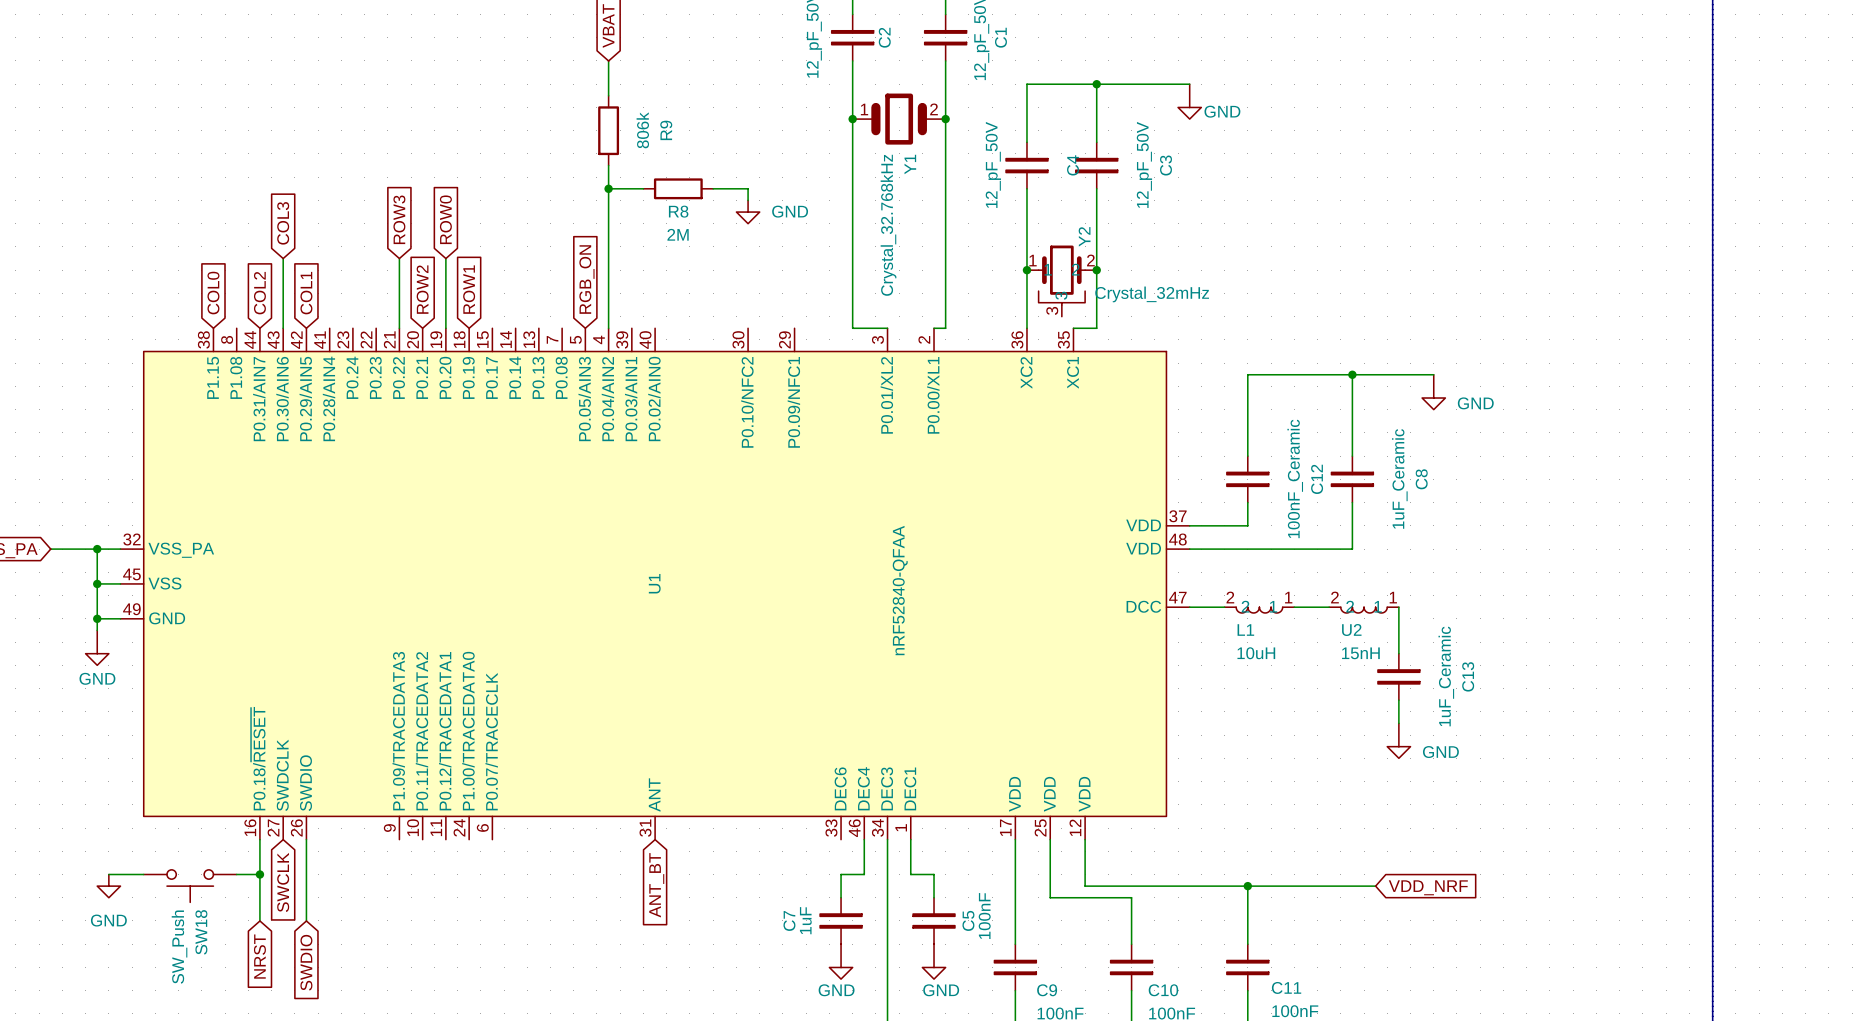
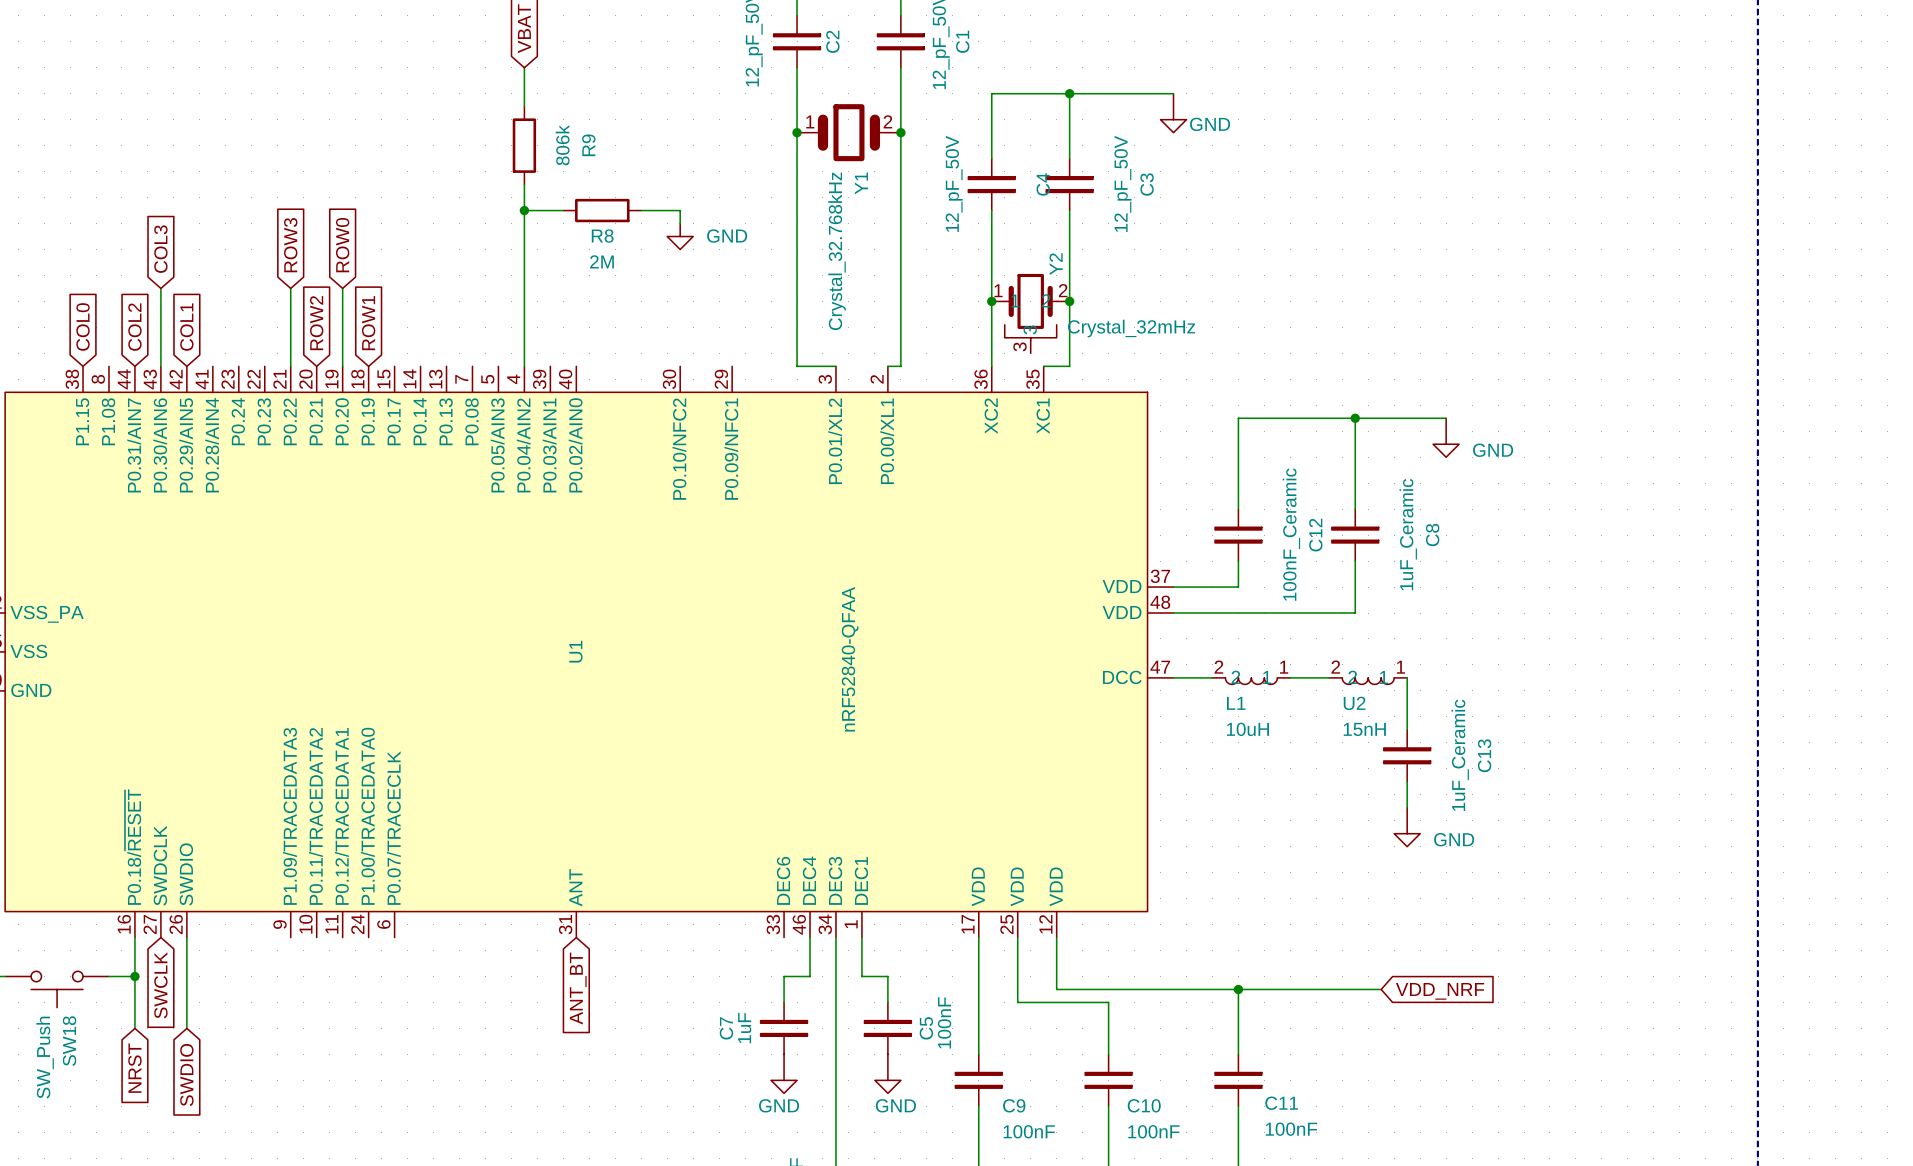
global label: RGB_ON (586, 279) -> none

